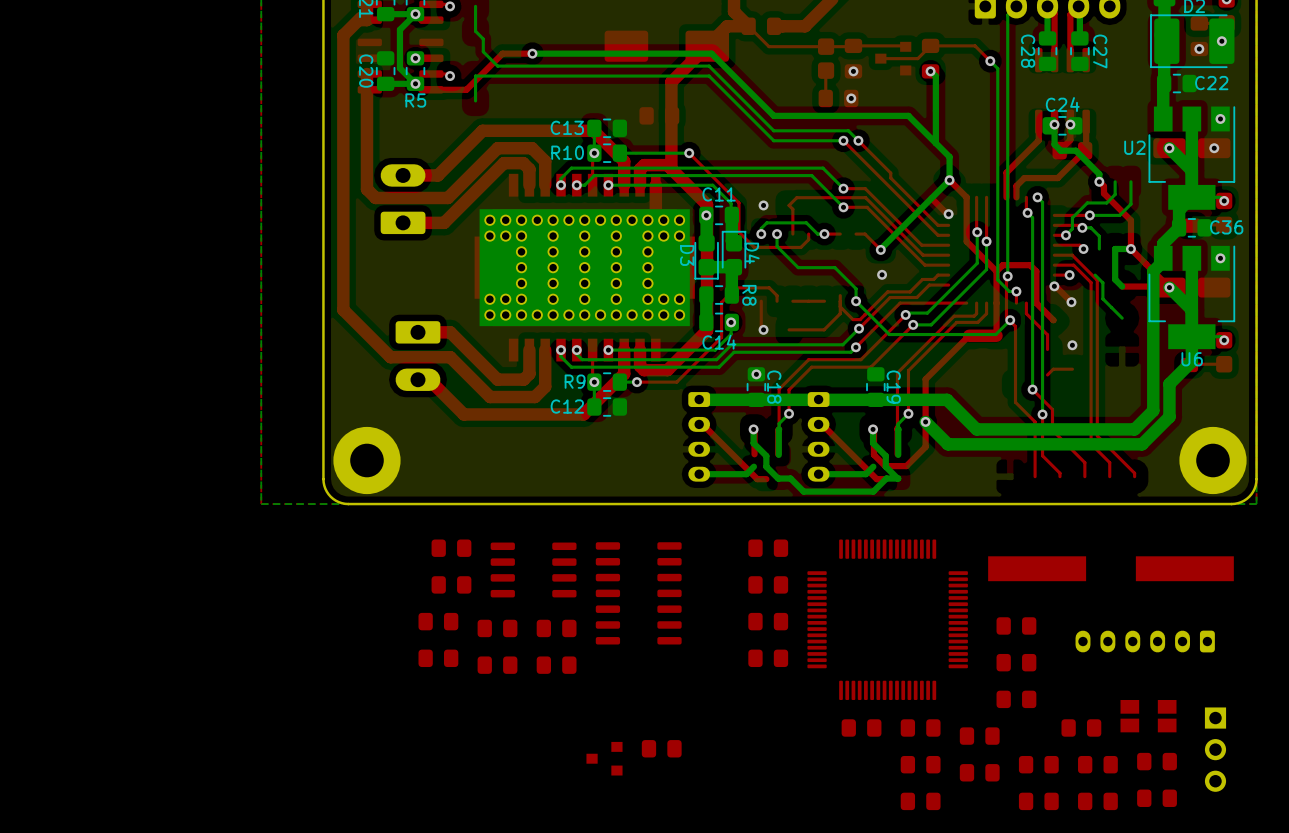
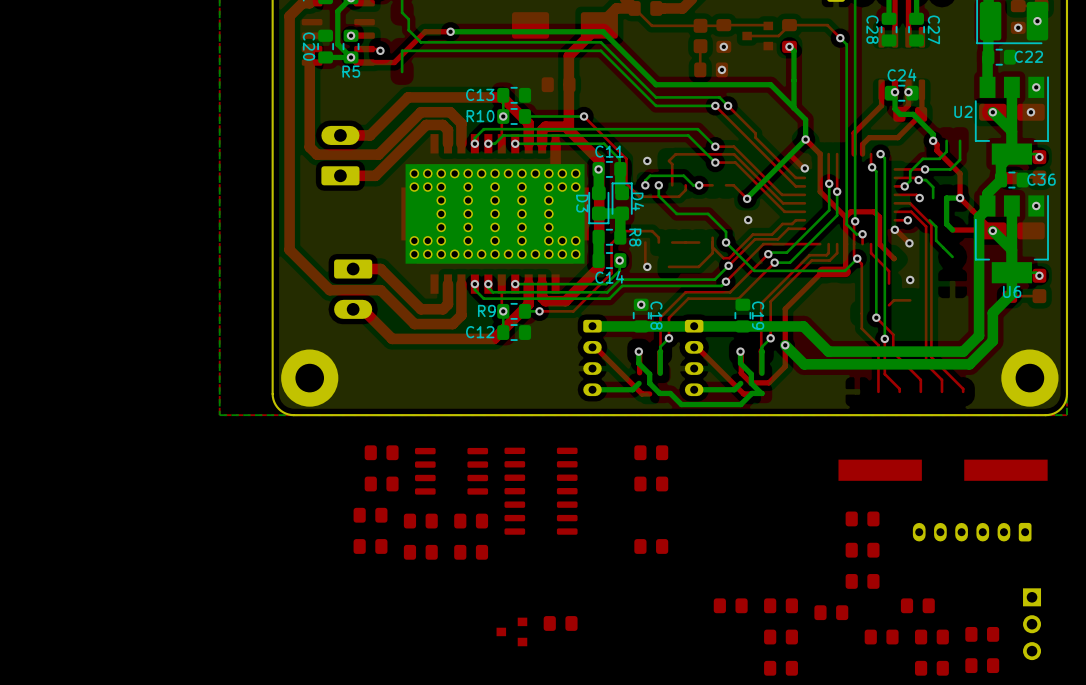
part: (887, 619) -> none
part: (768, 621) -> none
part: (1148, 716) -> none
part: (979, 772) -> none
part: (1038, 801) -> none

